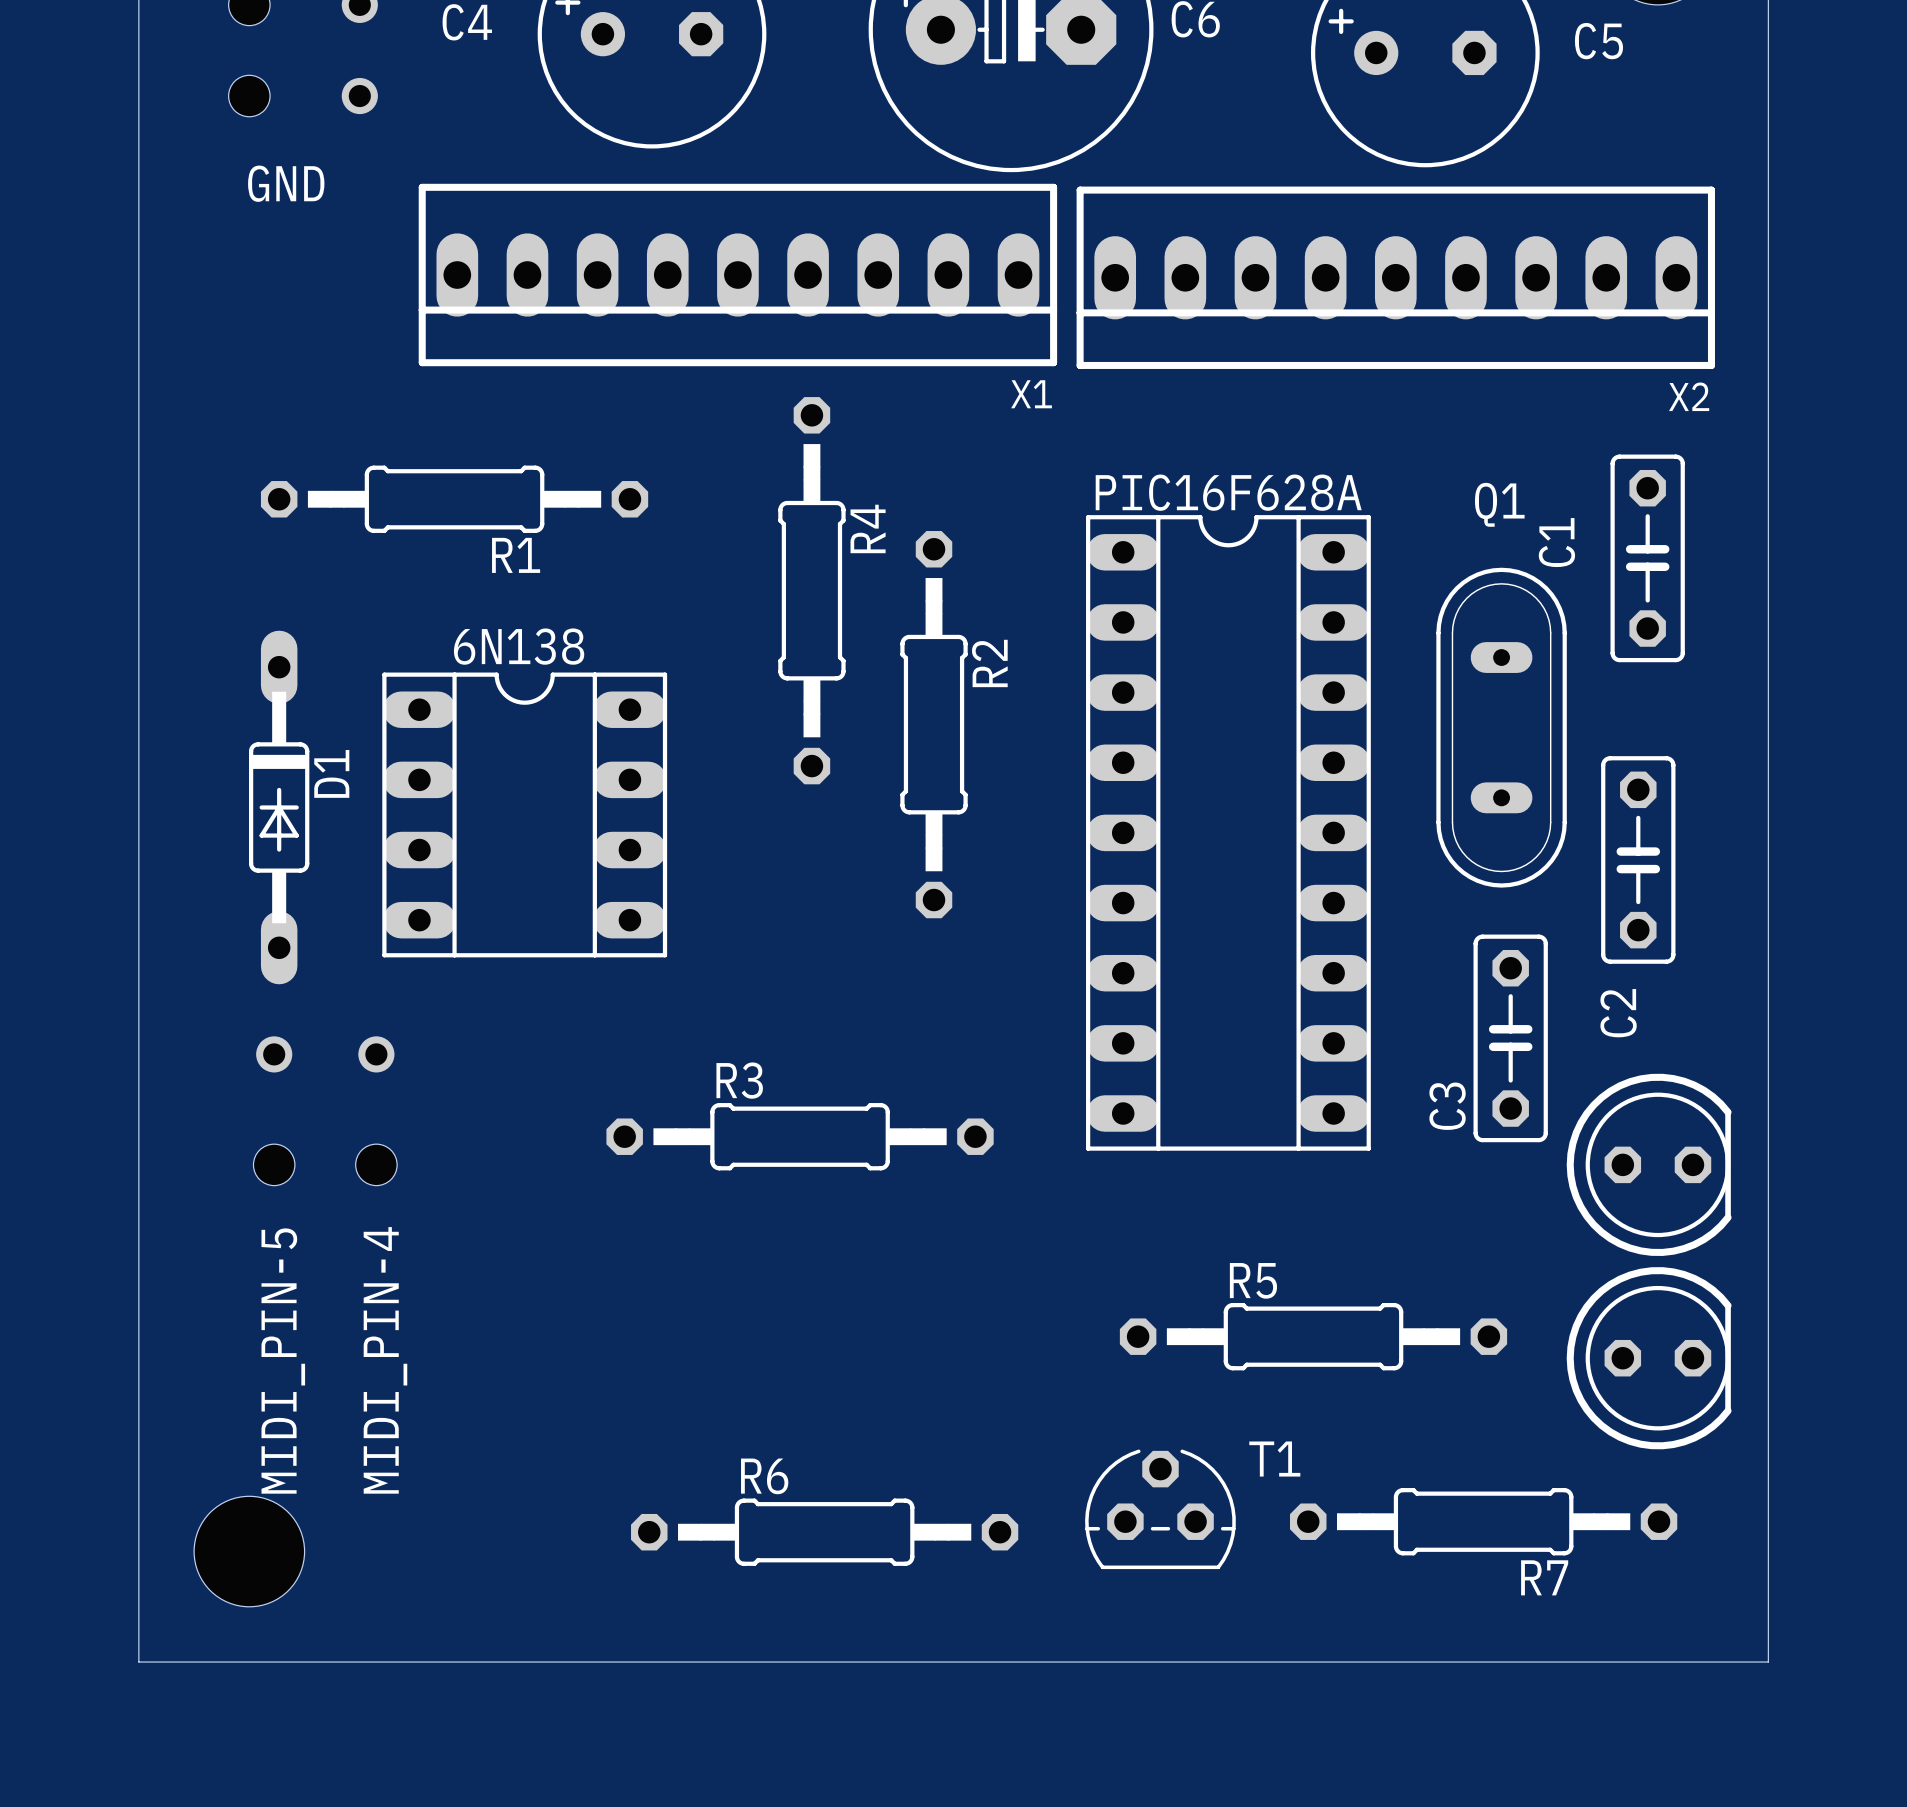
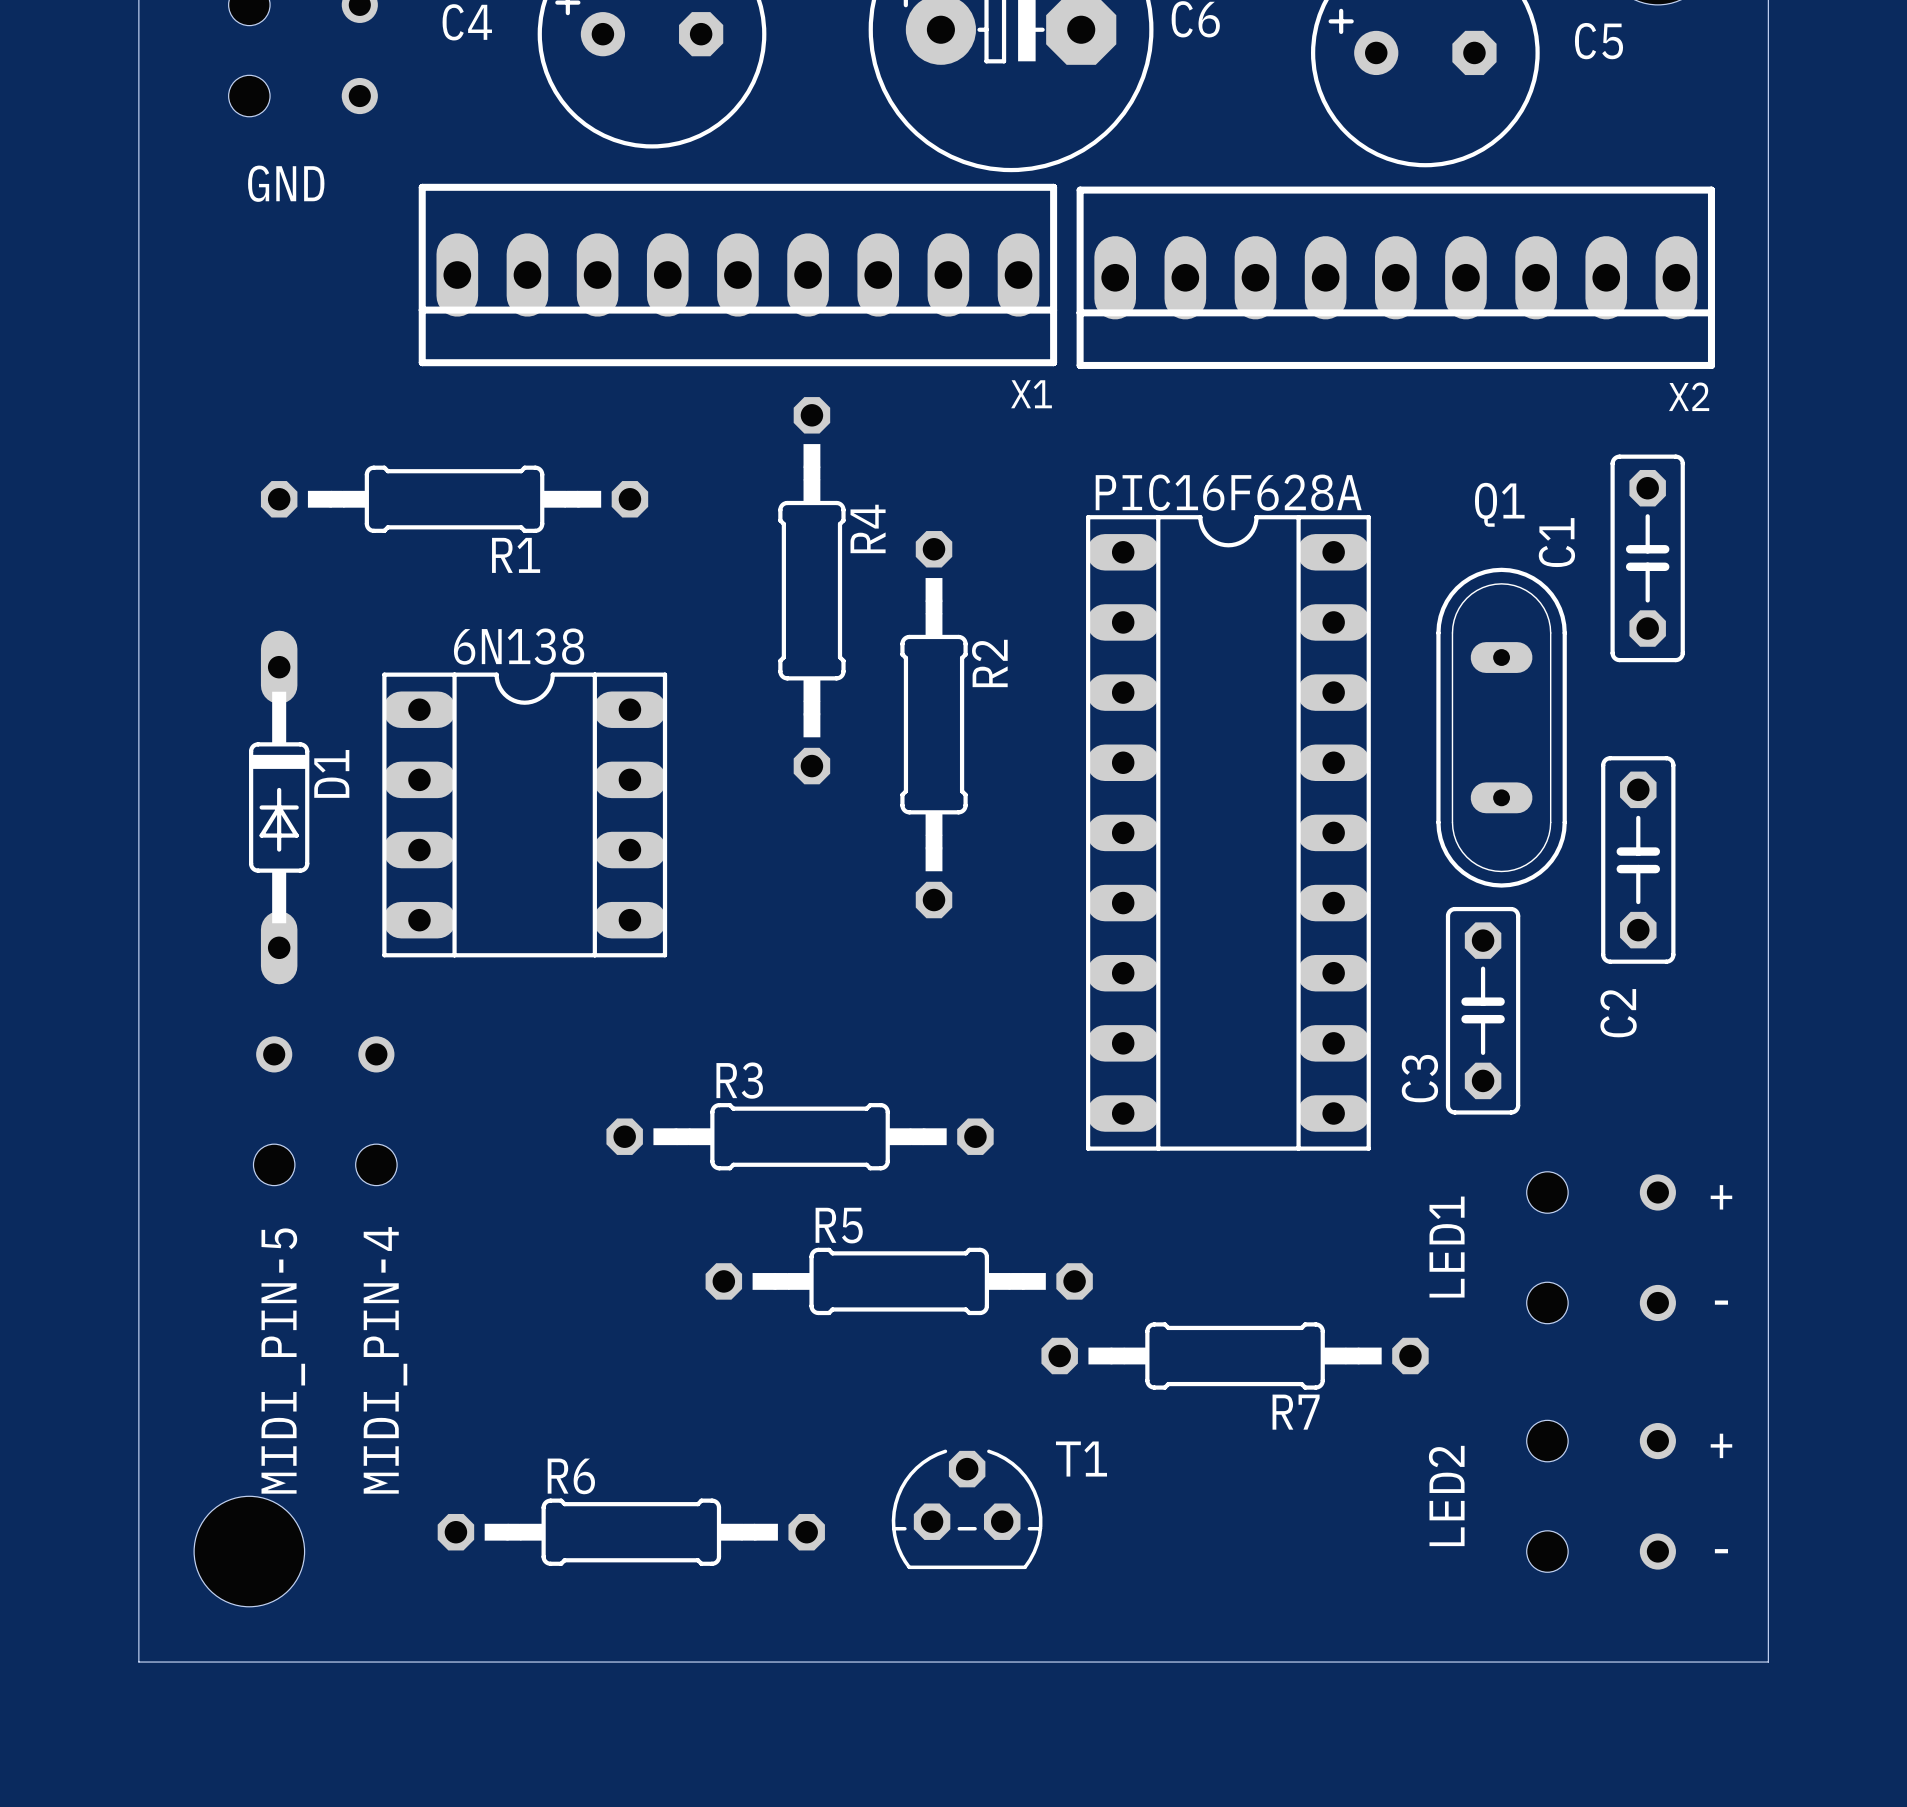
C3 position: (1510, 1038) -> (1483, 1010)
part: (1649, 1164) -> none
LED1: none -> (1601, 1247)
R5 position: (1313, 1336) -> (899, 1281)
part: (1649, 1358) -> none
LED2: none -> (1601, 1496)
T1 position: (1160, 1509) -> (967, 1509)
R7 position: (1483, 1521) -> (1235, 1356)
R6 position: (824, 1532) -> (631, 1532)

